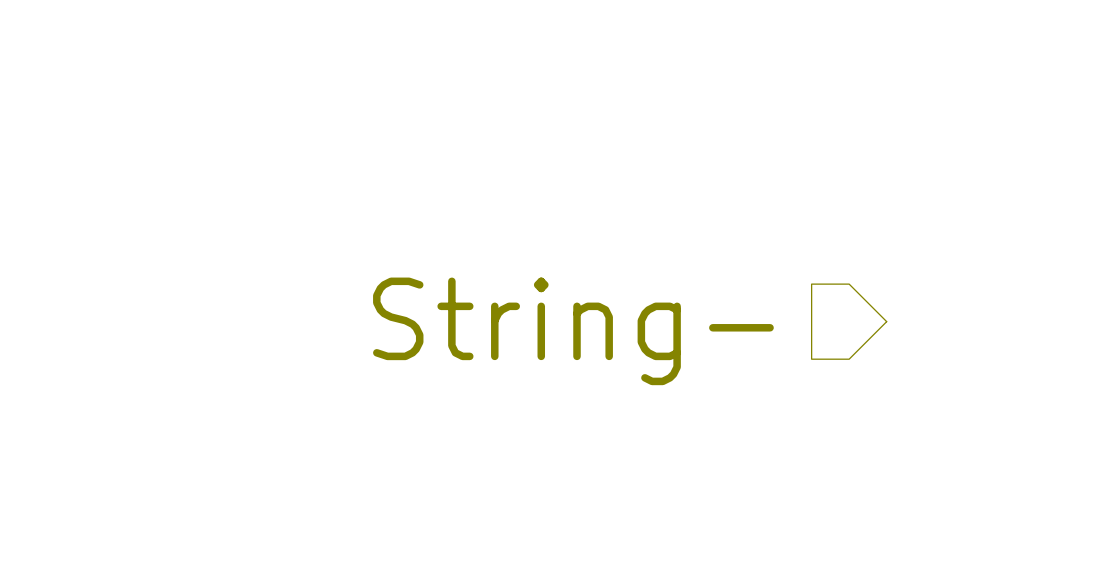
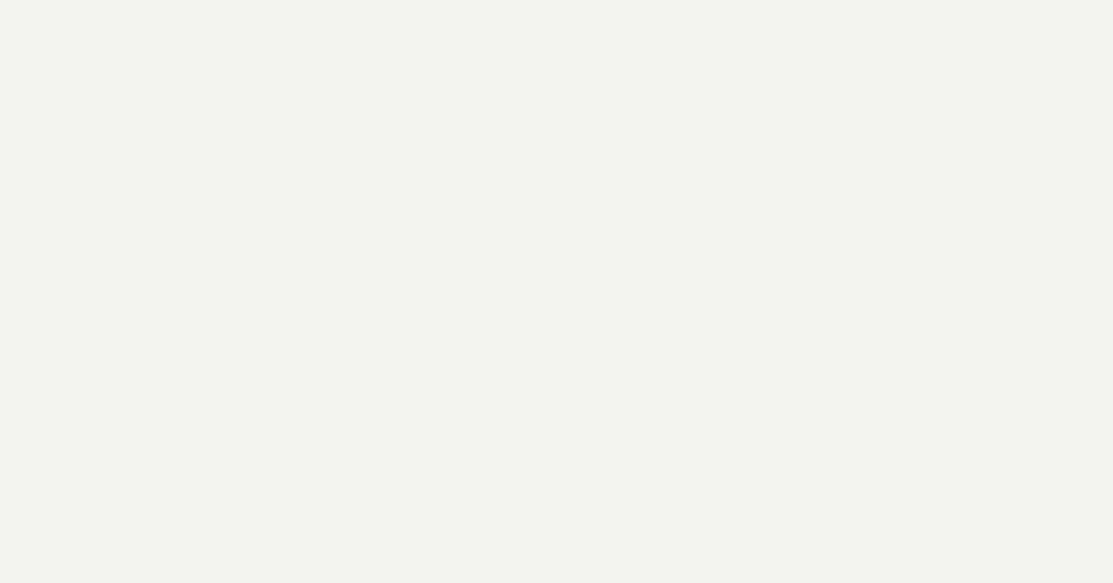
hierarchical label: String- (573, 331) -> none

